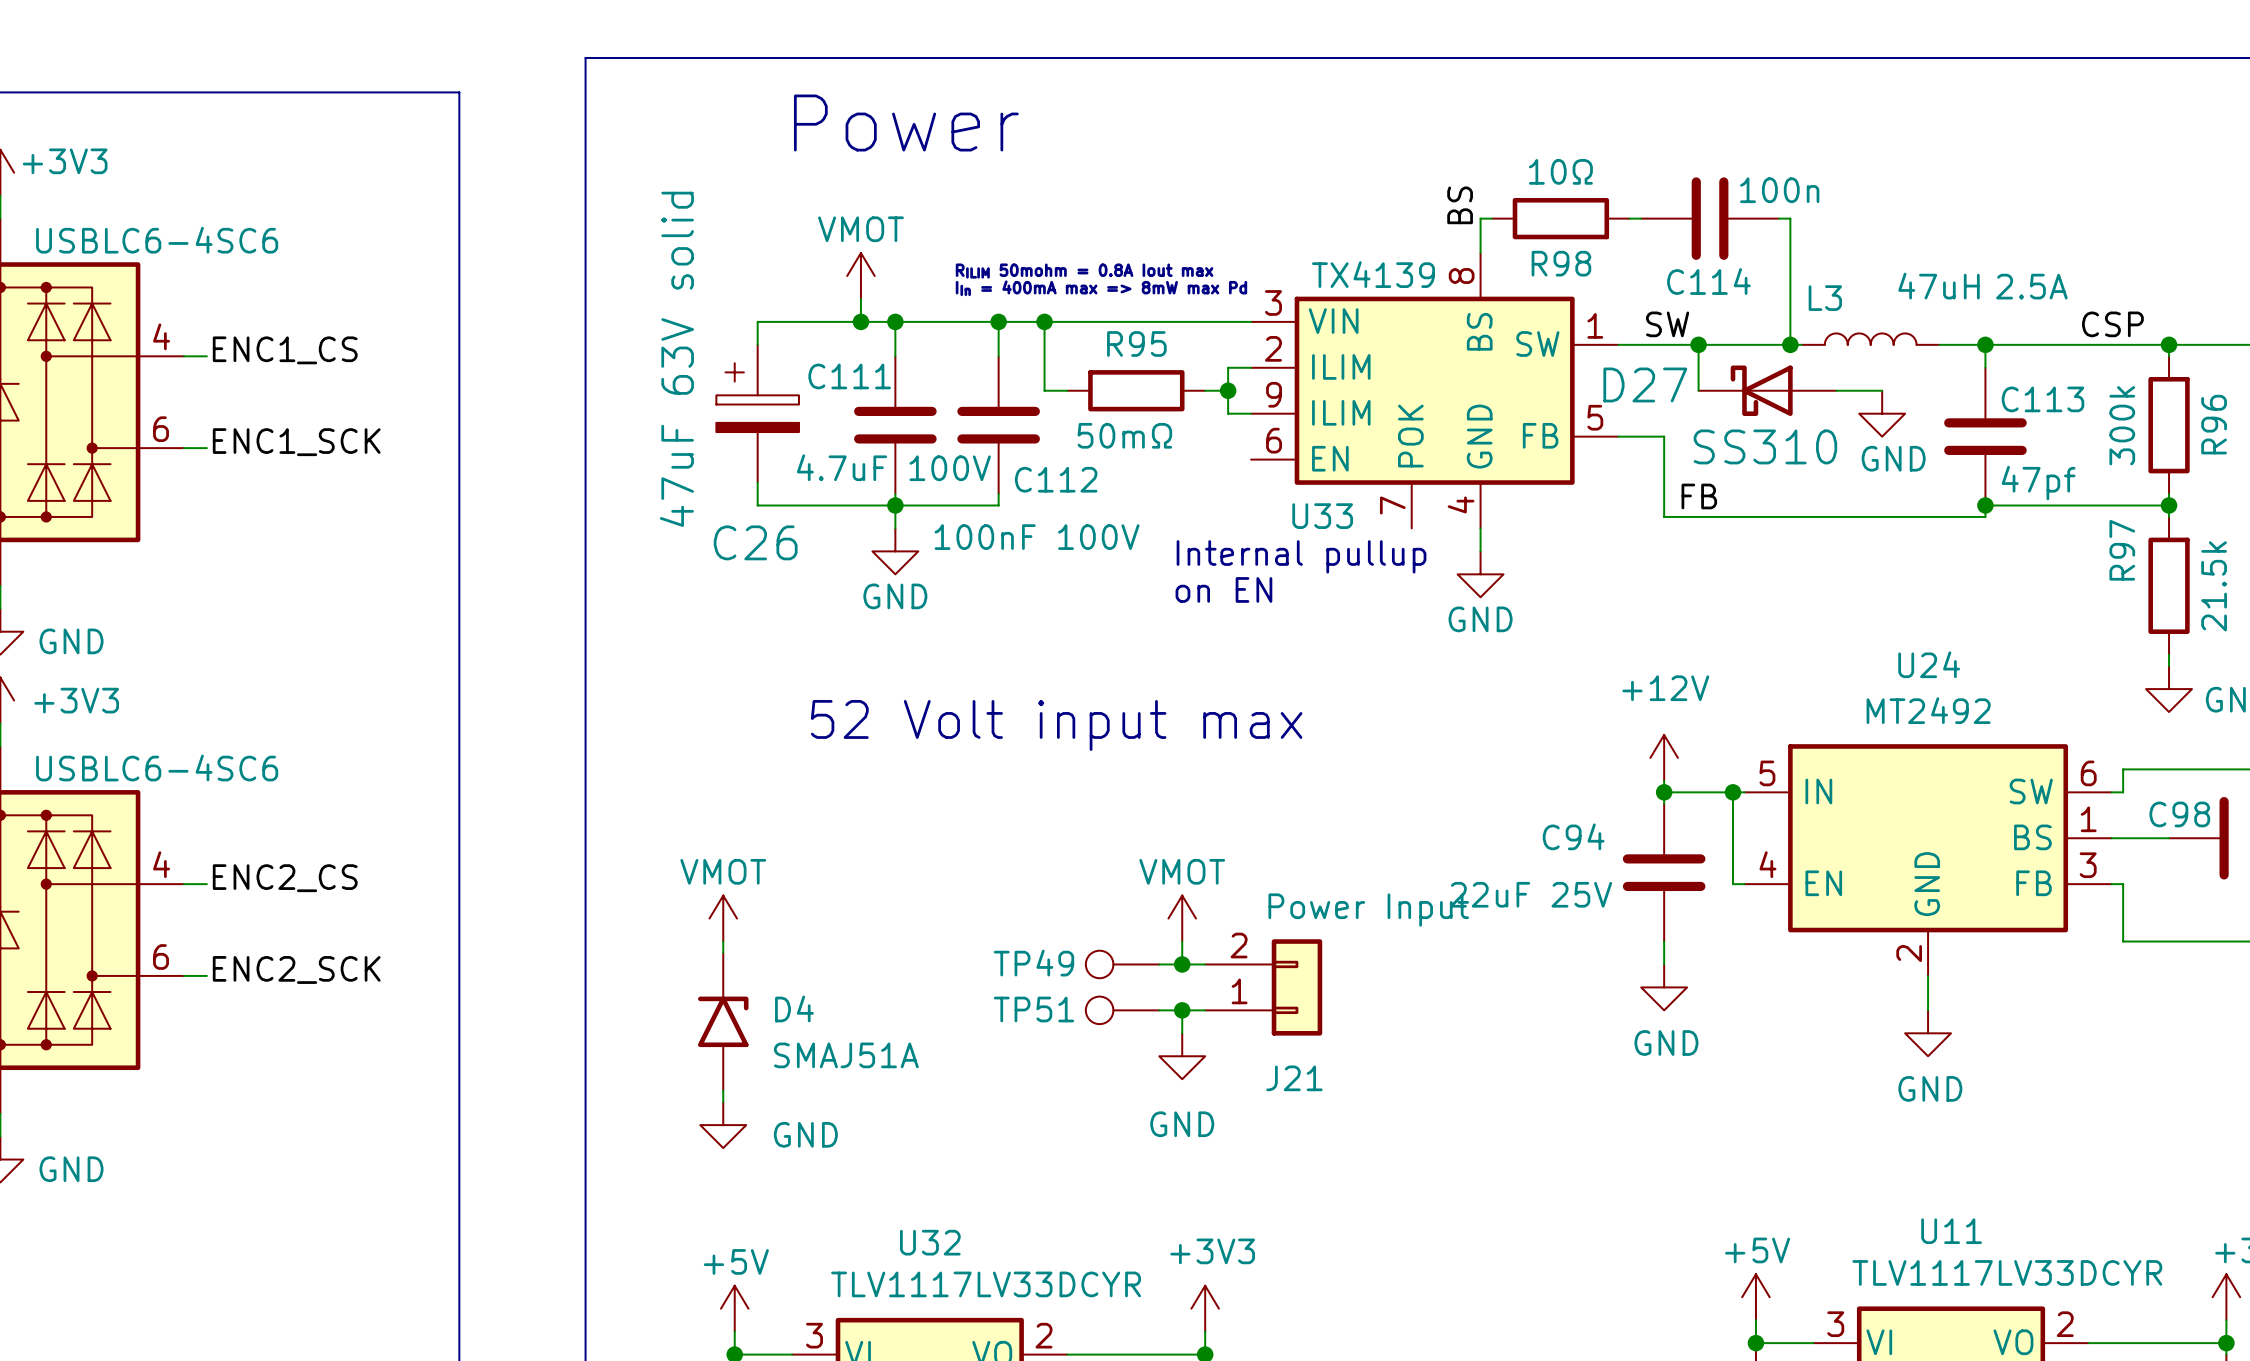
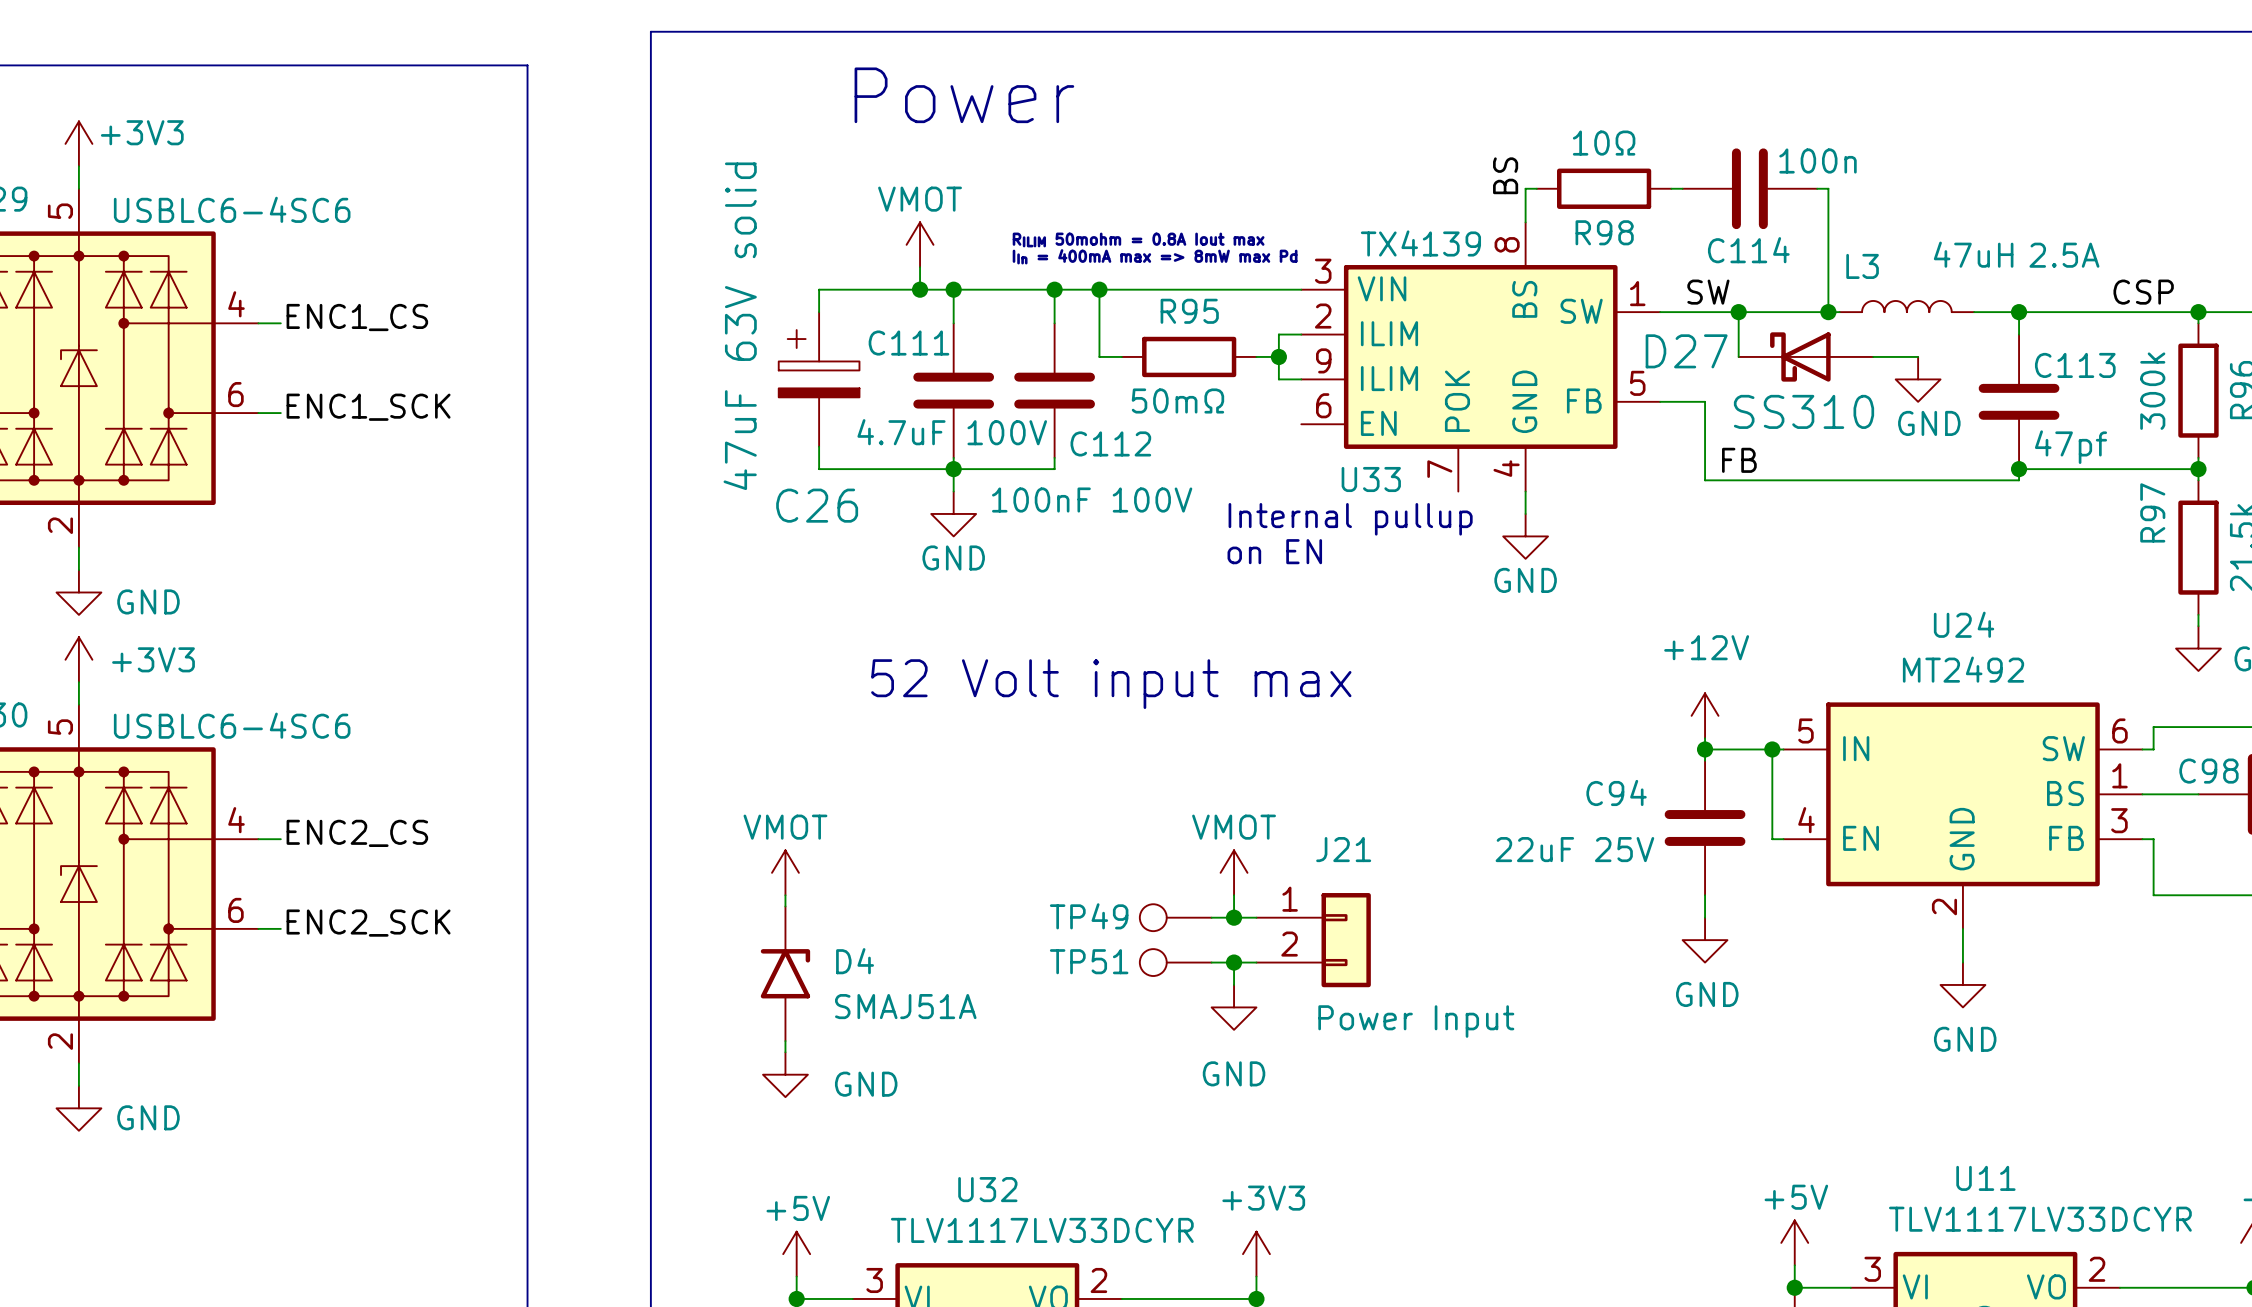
J21 flip: as is (1296, 987) -> up-down (1346, 940)

